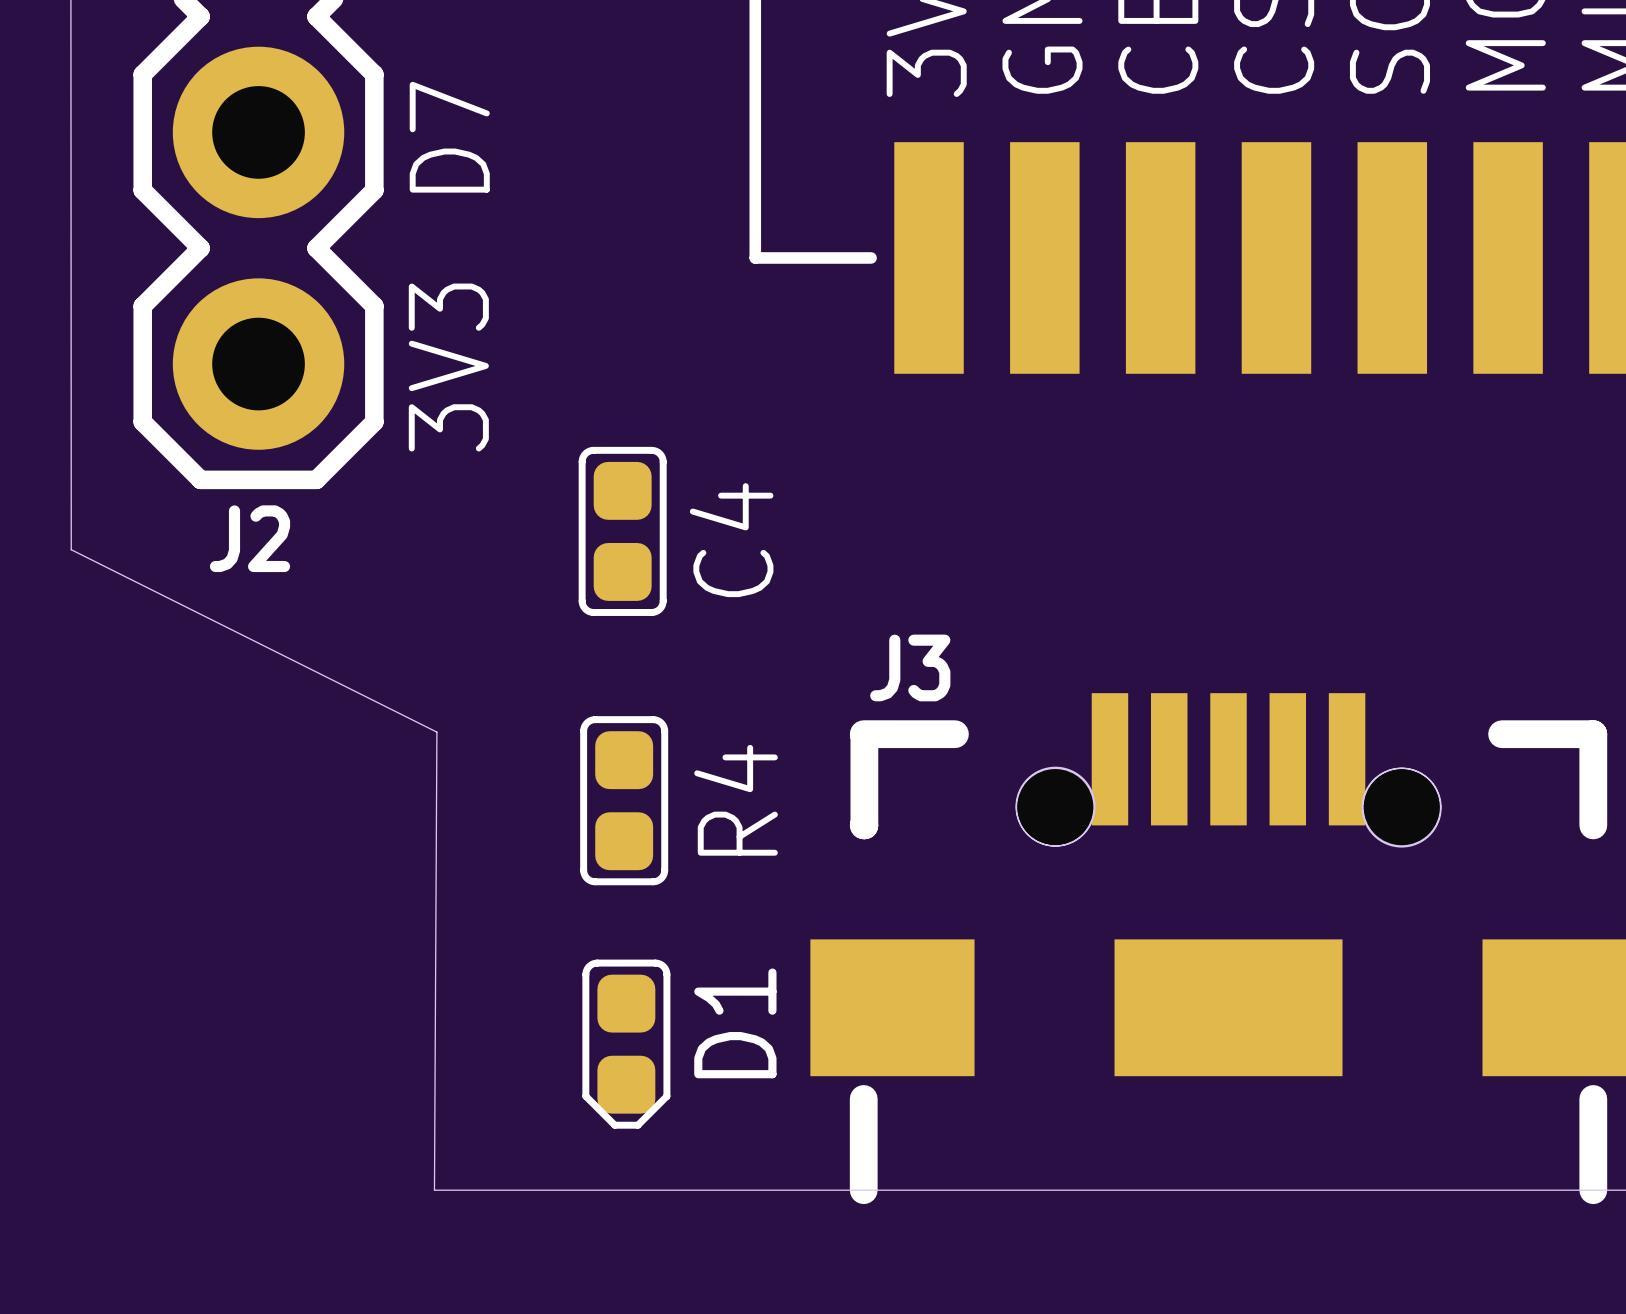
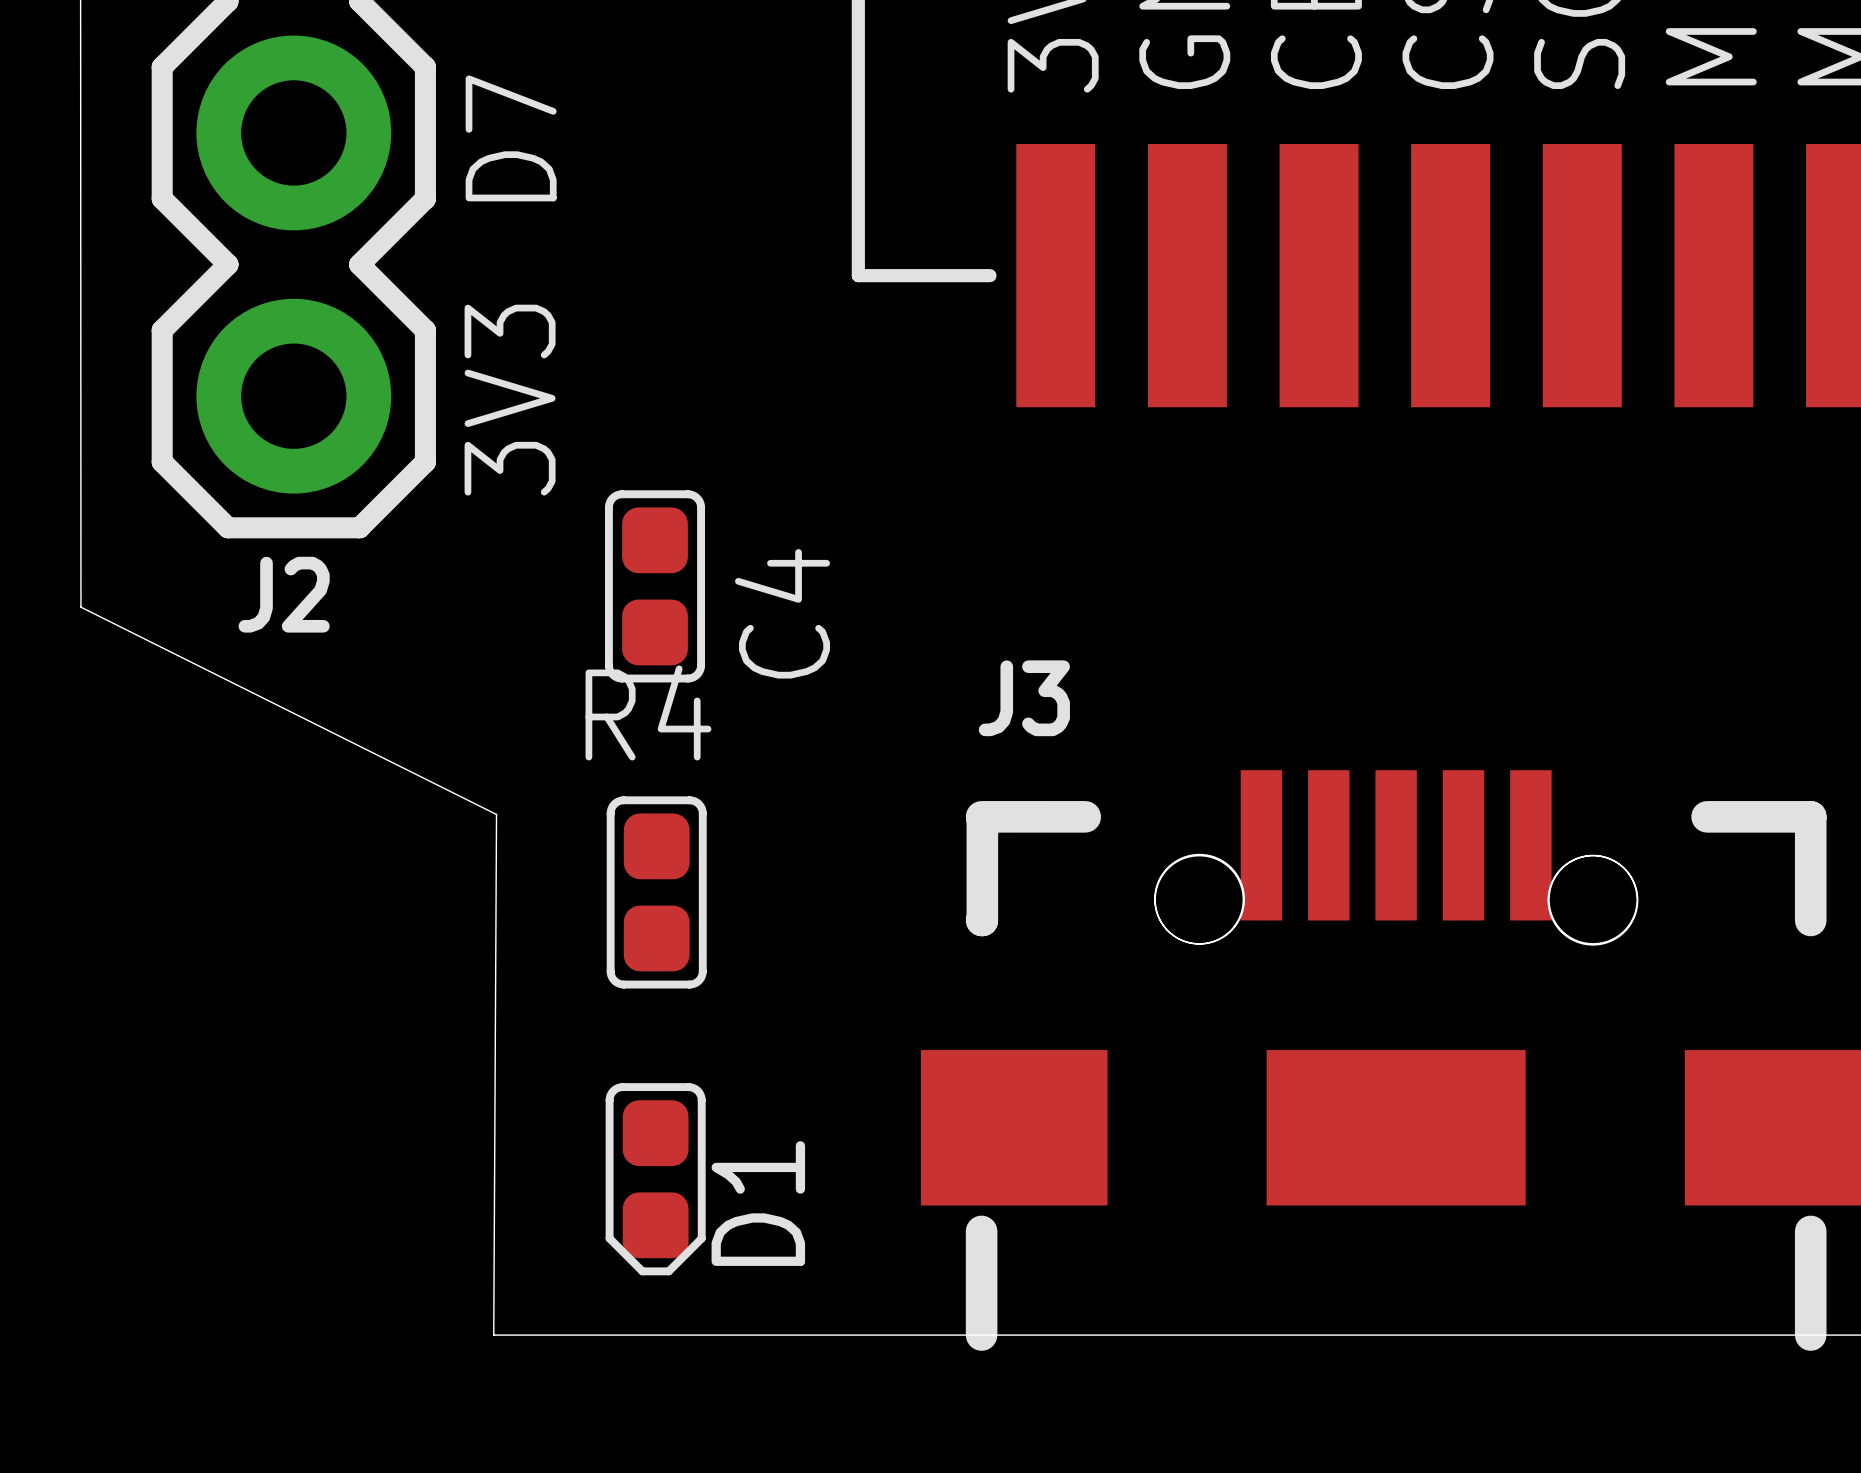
C4 position: (622, 531) -> (655, 586)
C4 name position: C4 (731, 540) -> C4 (782, 613)
J3 name position: J3 (910, 667) -> J3 (1024, 698)
R4 position: (624, 800) -> (656, 892)
R4 name rotation: 0° (736, 800) -> 90° clockwise (648, 712)
R4 name position: R4 (736, 800) -> R4 (648, 712)
D1 name position: D1 (735, 1023) -> D1 (758, 1203)
D1 position: (626, 1044) -> (655, 1179)

